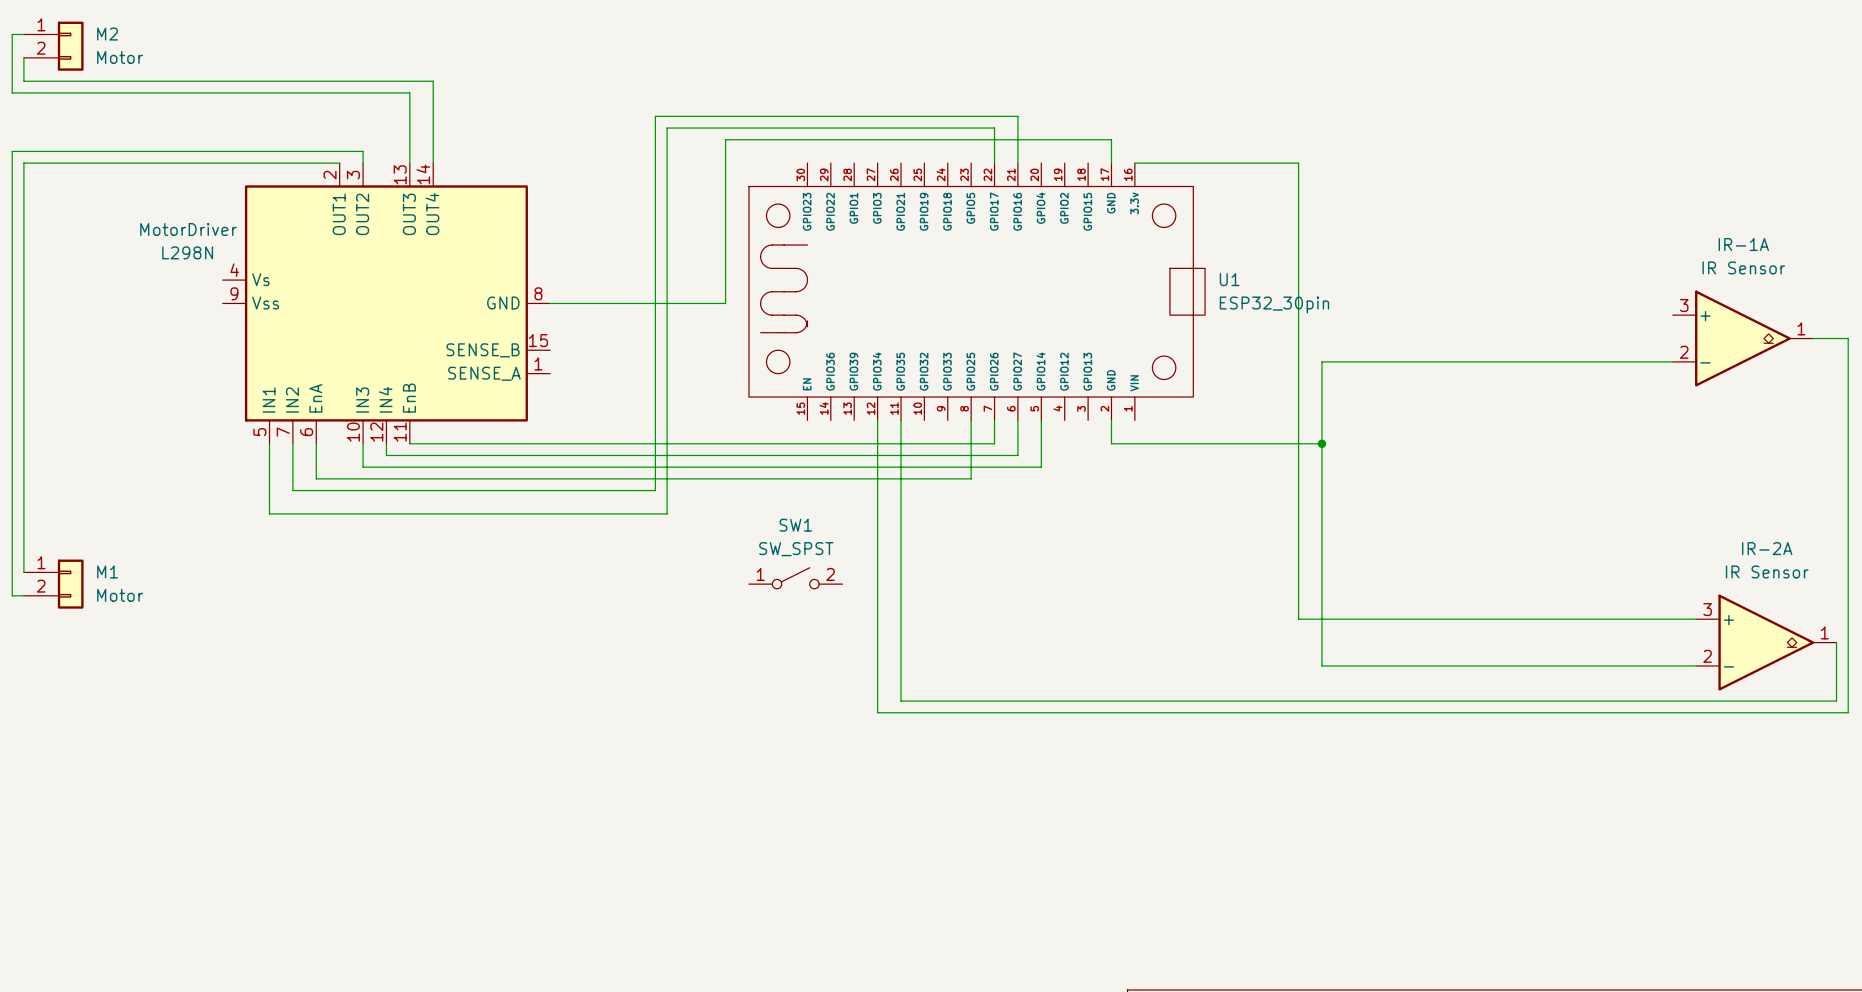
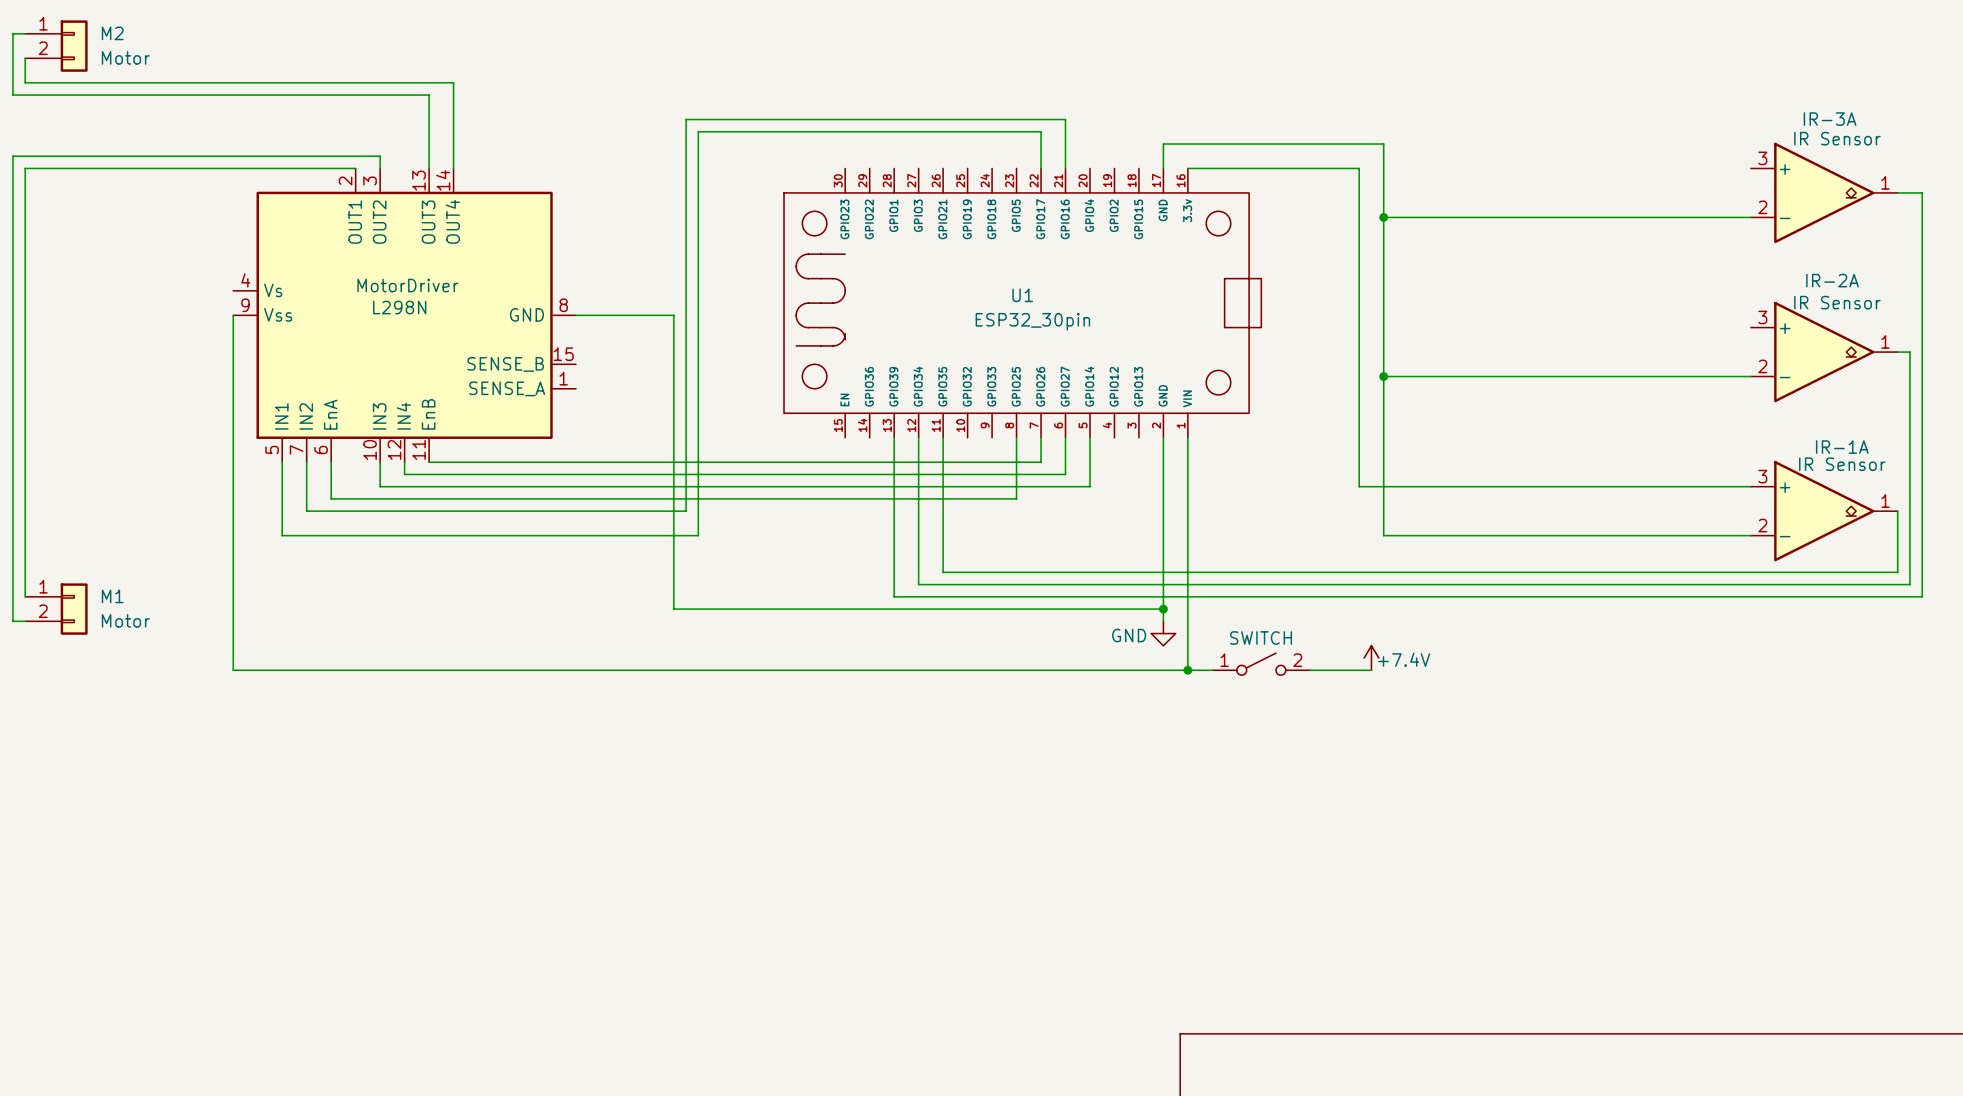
wire: (1111, 139) (725, 139) (725, 303) (643, 303) -> (1163, 609) (673, 609) (673, 315)
wire: none -> (1163, 144) (1383, 144) (1383, 376)
IR-3A: none -> IR Sensor (1824, 192)
wire: none -> (1897, 192) (1922, 192) (1922, 596) (894, 596) (894, 437)
wire: none -> (1383, 217) (1750, 217)
junction: none -> (1383, 217)
MotorDriver name position: MotorDriver (188, 229) -> MotorDriver (407, 285)
IR-1A name: IR-1A (1743, 244) -> IR-2A (1832, 280)
MotorDriver value position: L298N (187, 252) -> L298N (399, 307)
IR-1A value position: IR Sensor (1743, 267) -> IR Sensor (1837, 302)
U1 name position: U1 (1229, 279) -> U1 (1022, 295)
wire: none -> (233, 315) (233, 670) (1212, 670)
U1 text position: ESP32_30pin (1274, 304) -> ESP32_30pin (1032, 321)
wire: (1824, 338) (1848, 338) (1848, 712) (877, 712) (877, 560) -> (1909, 352) (1909, 584) (918, 584)
junction: none -> (1383, 376)
wire: none -> (1187, 437) (1187, 670)
wire: (1111, 443) (1321, 443) -> (1163, 462) (1163, 621)
junction: (1321, 443) -> none
wire: (1298, 467) (1298, 619) (1696, 619) -> (1359, 486) (1750, 486)
IR-1A: none -> IR Sensor (1824, 511)
wire: (1321, 513) (1321, 665) (1696, 665) -> (1383, 535) (1750, 535)
wire: (900, 549) (900, 701) (1836, 701) (1836, 642) -> (943, 572) (1897, 572) (1897, 511)
SW1: SW_SPST (795, 578) -> none
junction: none -> (1163, 609)
power symbol: none -> GND (1163, 633)
power symbol: none -> +7.4V (1371, 658)
SWITCH: none -> (1261, 664)
junction: none -> (1187, 670)
wire: none -> (1310, 670) (1371, 670)
IR-2A: IR Sensor (1766, 642) -> none

